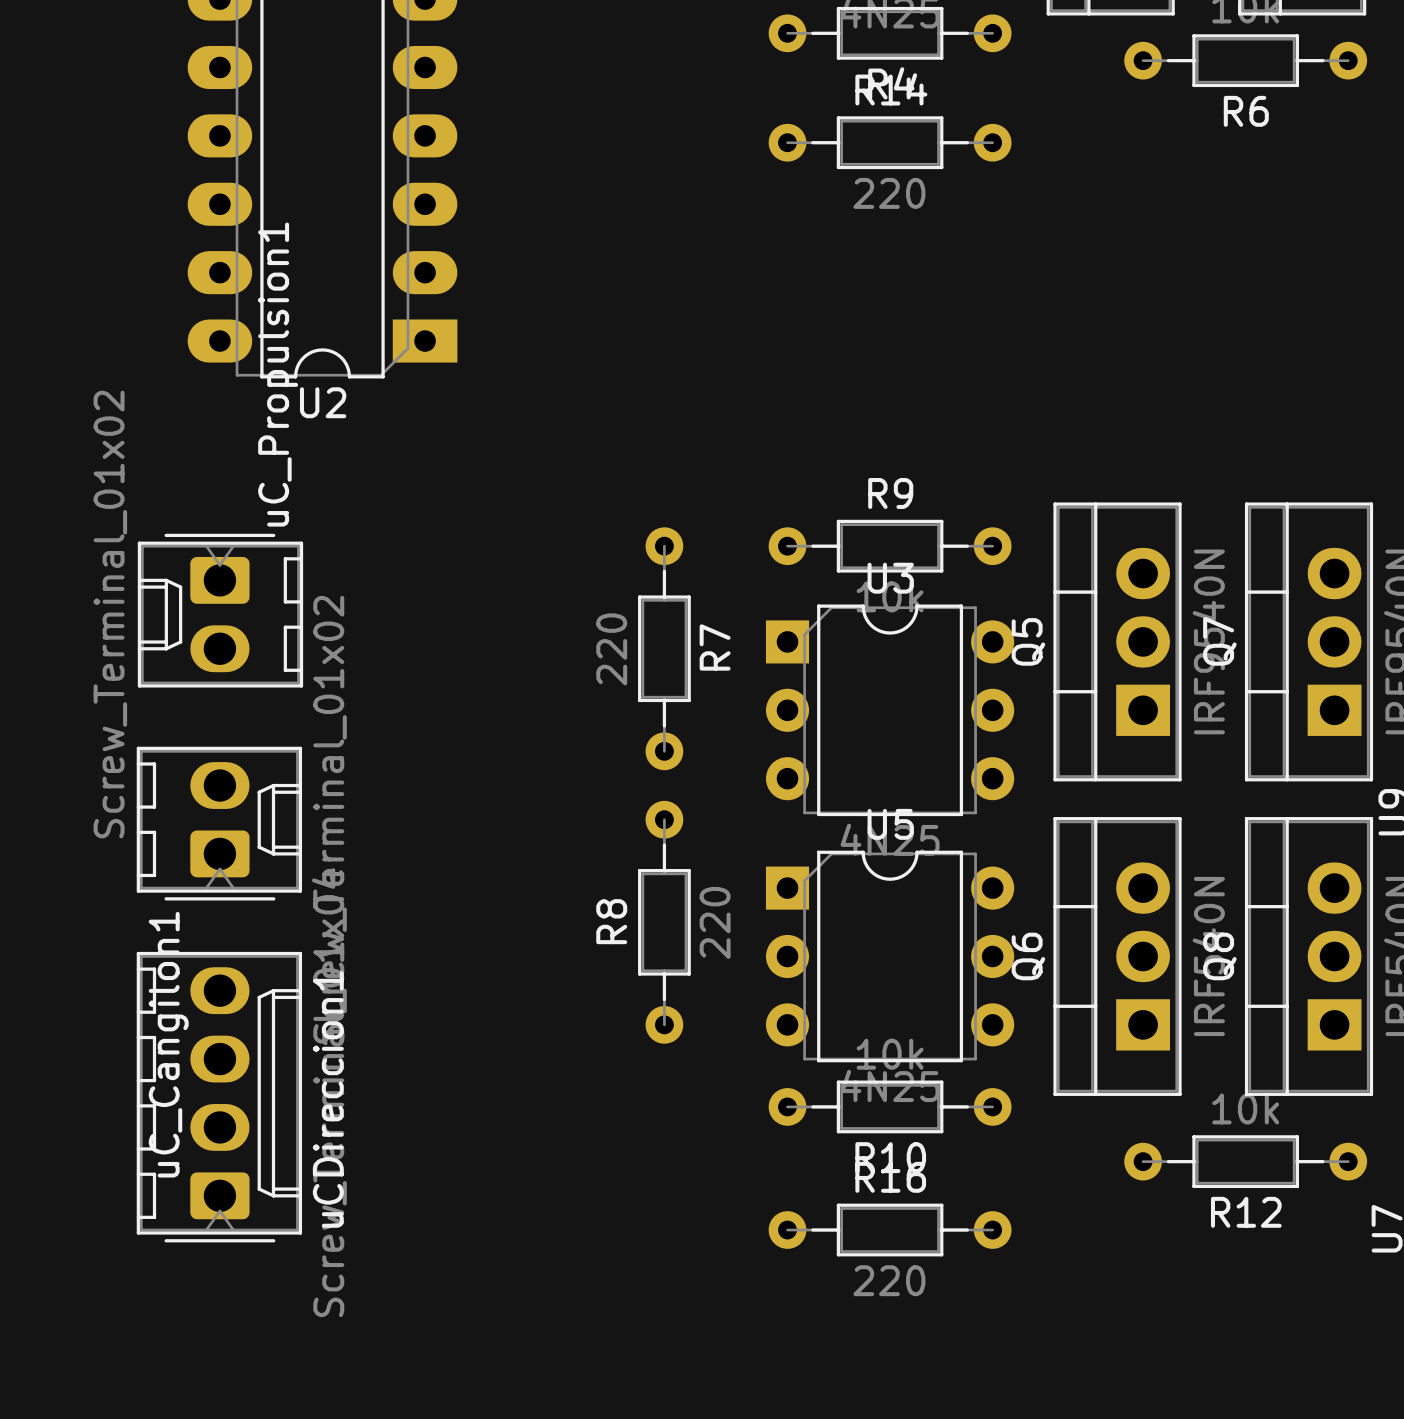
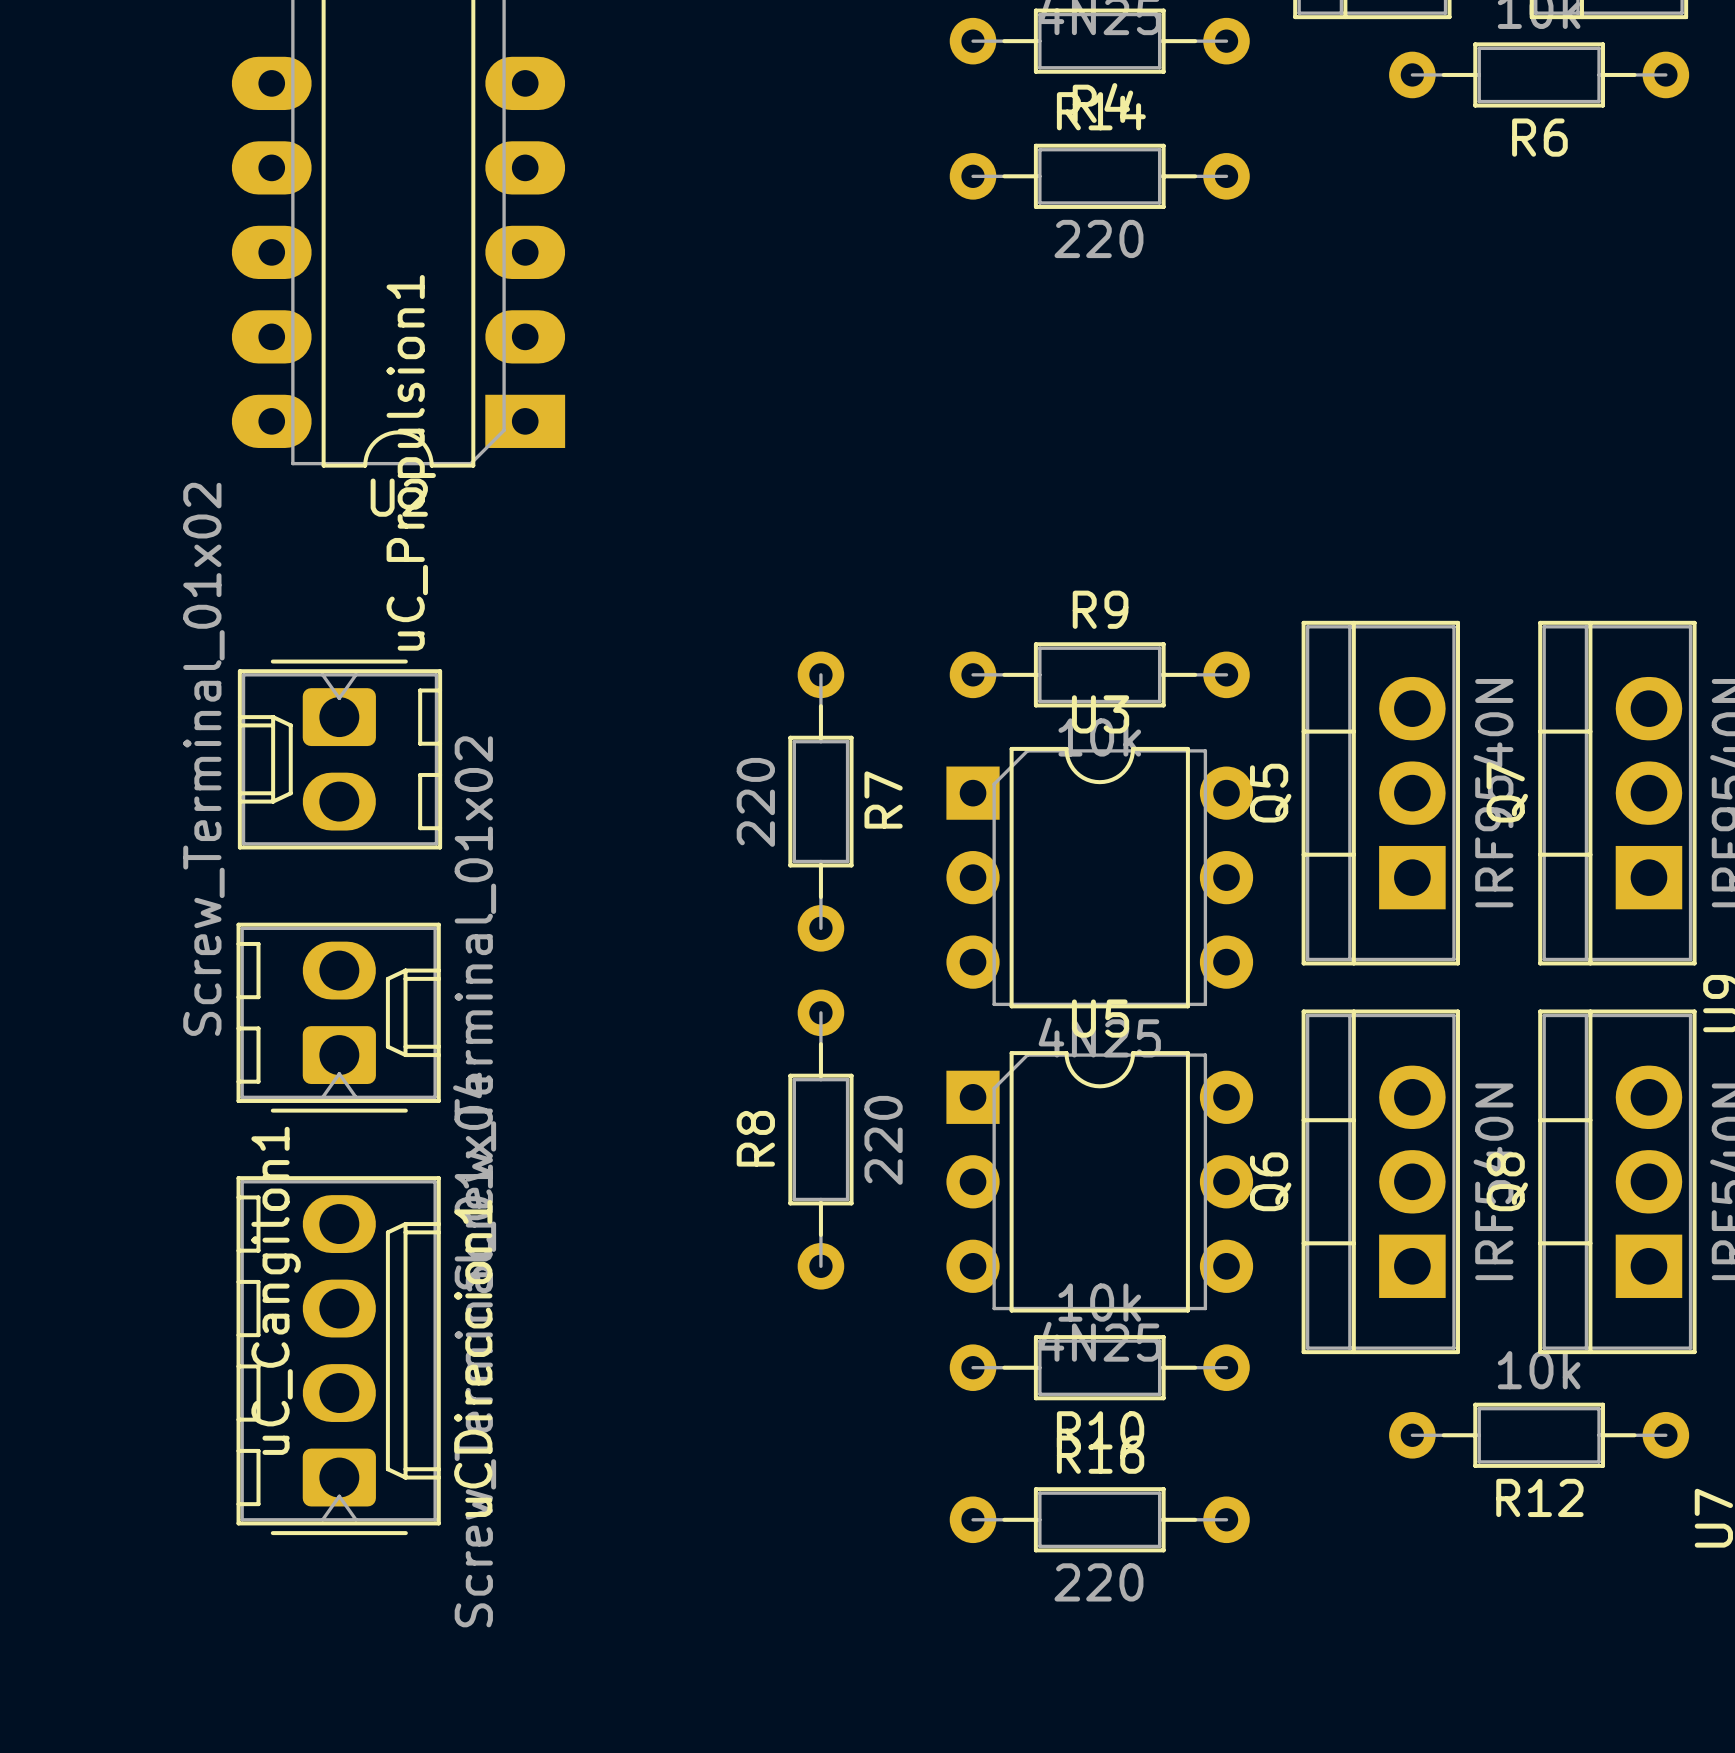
uC_Propulsion1 position: (220, 610) -> (339, 754)
uC_Cangilon1 position: (219, 823) -> (338, 1017)
uCDireccion1 position: (219, 1097) -> (338, 1355)

